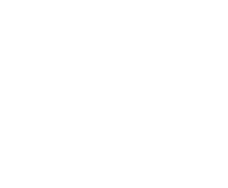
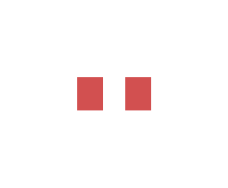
part: none -> (114, 93)

